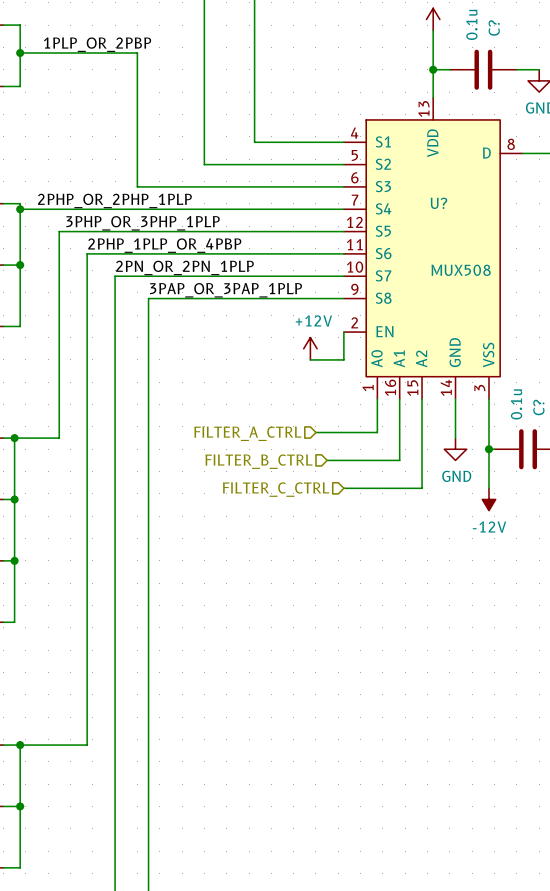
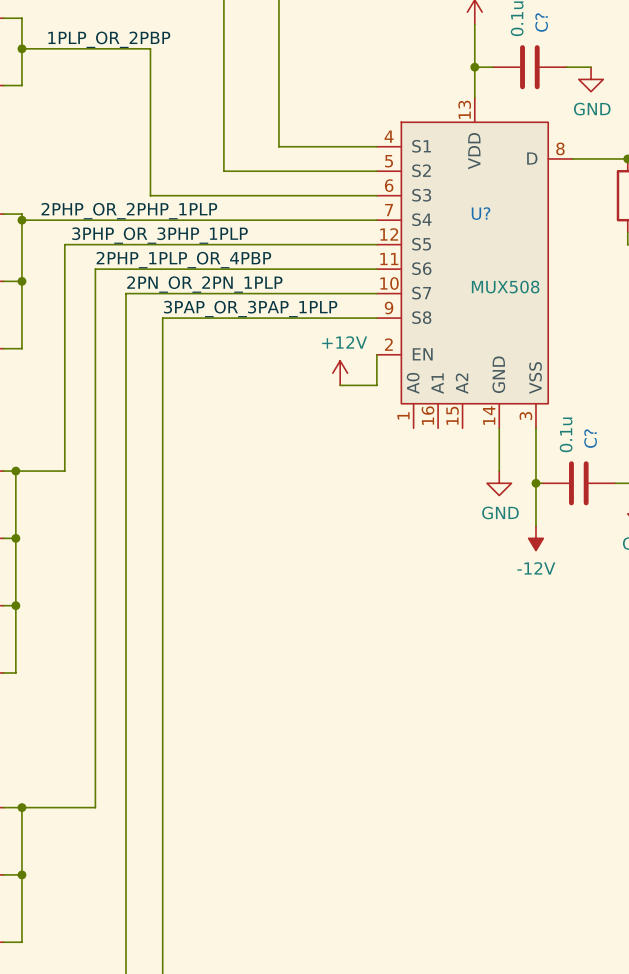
wire: (377, 399) (377, 432) (315, 432) -> none
wire: (399, 399) (399, 460) (327, 460) -> none
wire: (422, 399) (422, 488) (343, 488) -> none
hierarchical label: FILTER_A_CTRL (247, 433) -> none
hierarchical label: FILTER_B_CTRL (258, 461) -> none
hierarchical label: FILTER_C_CTRL (276, 489) -> none

